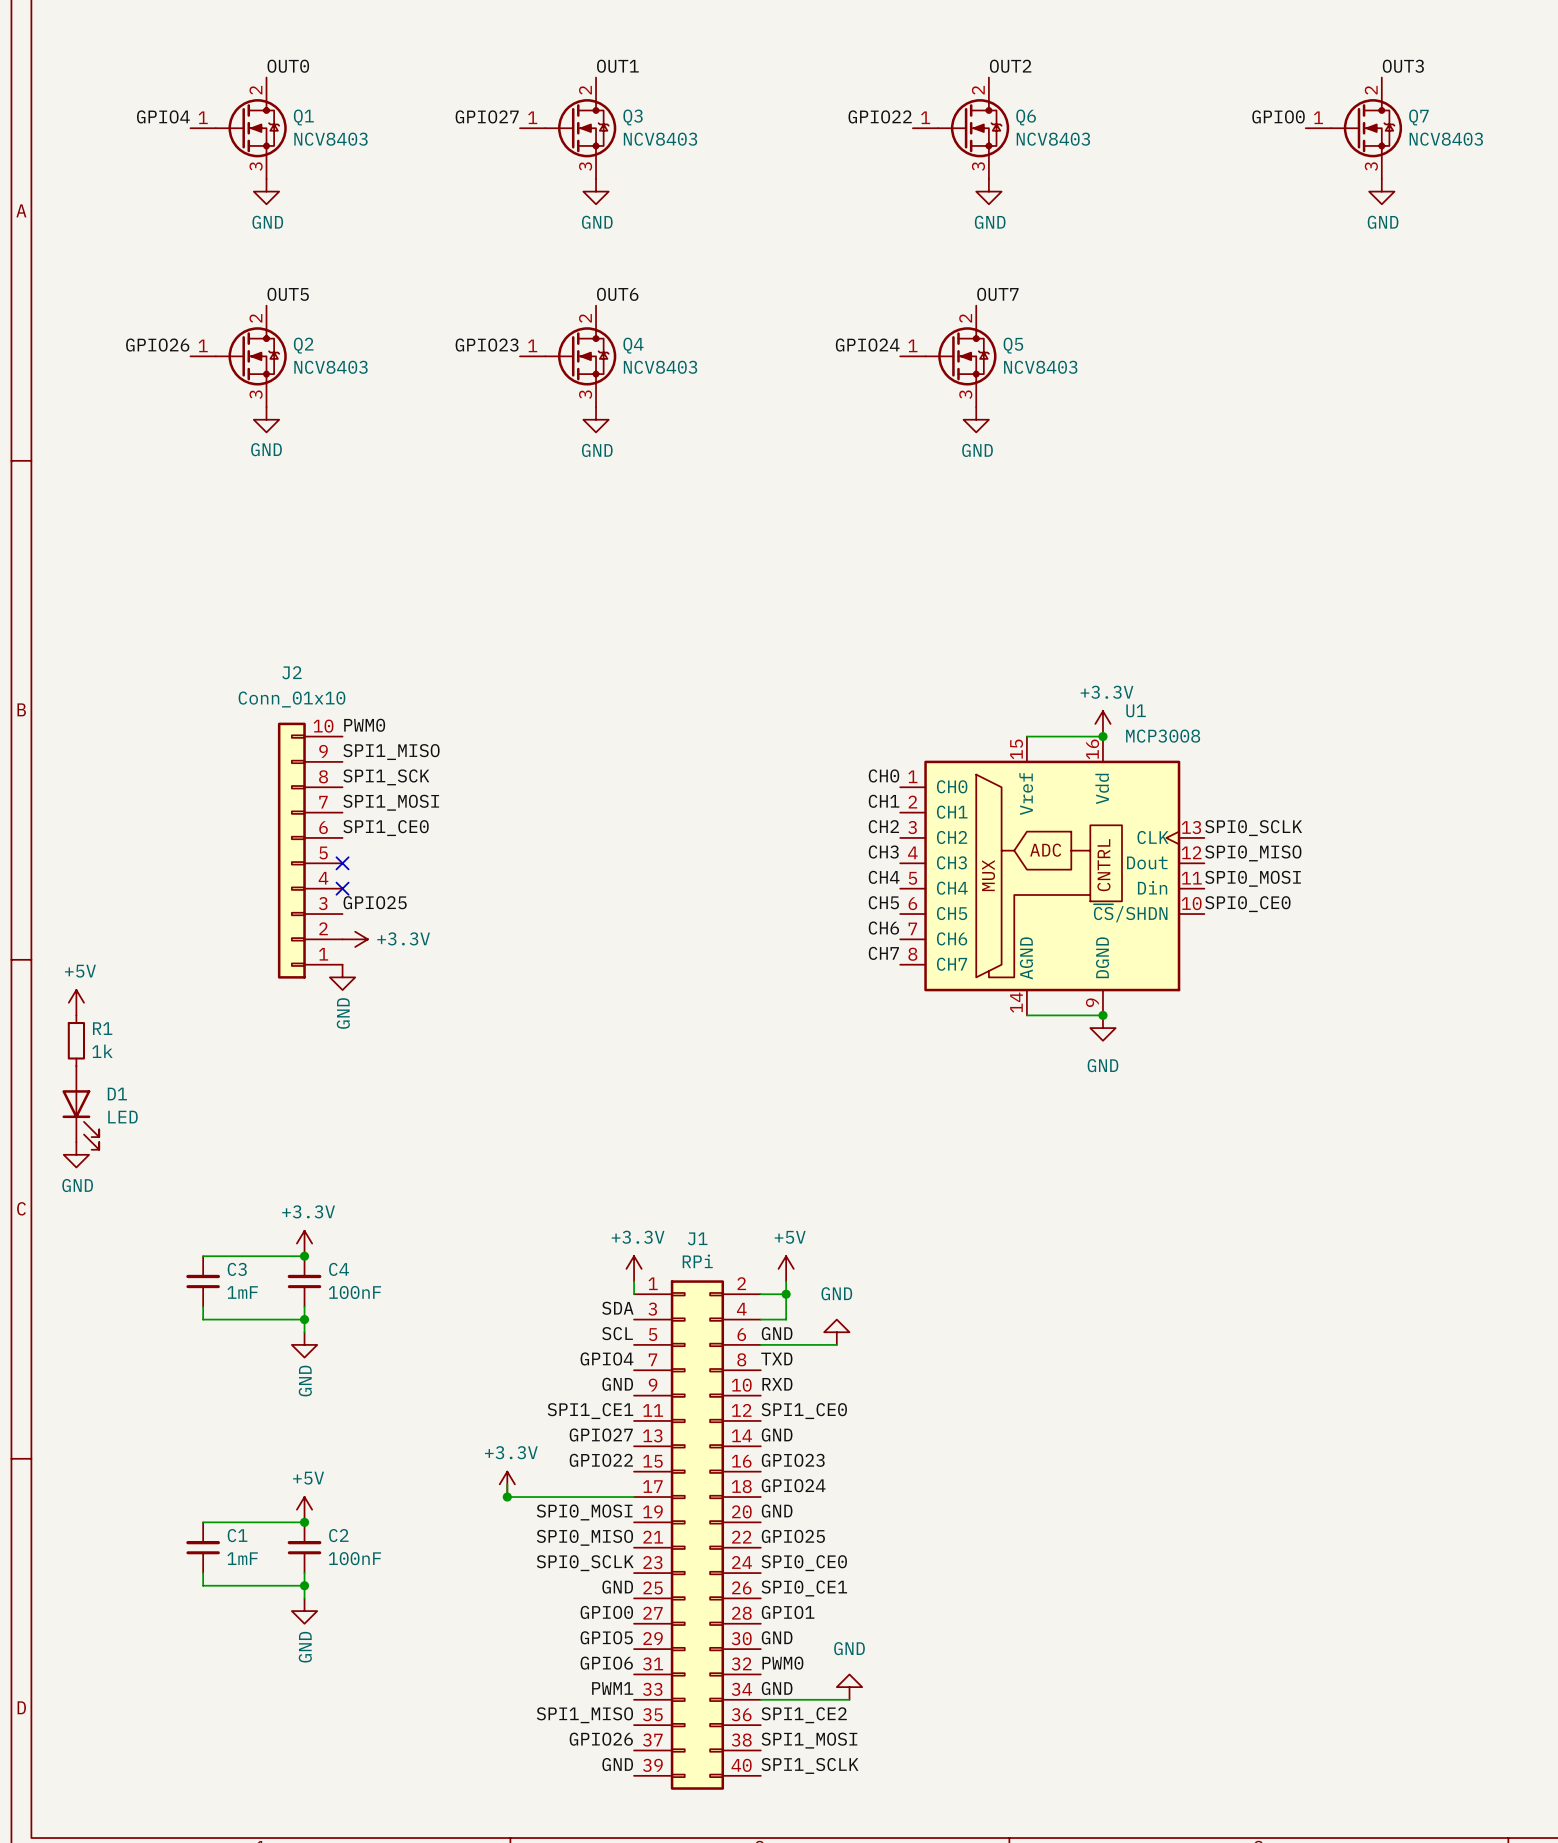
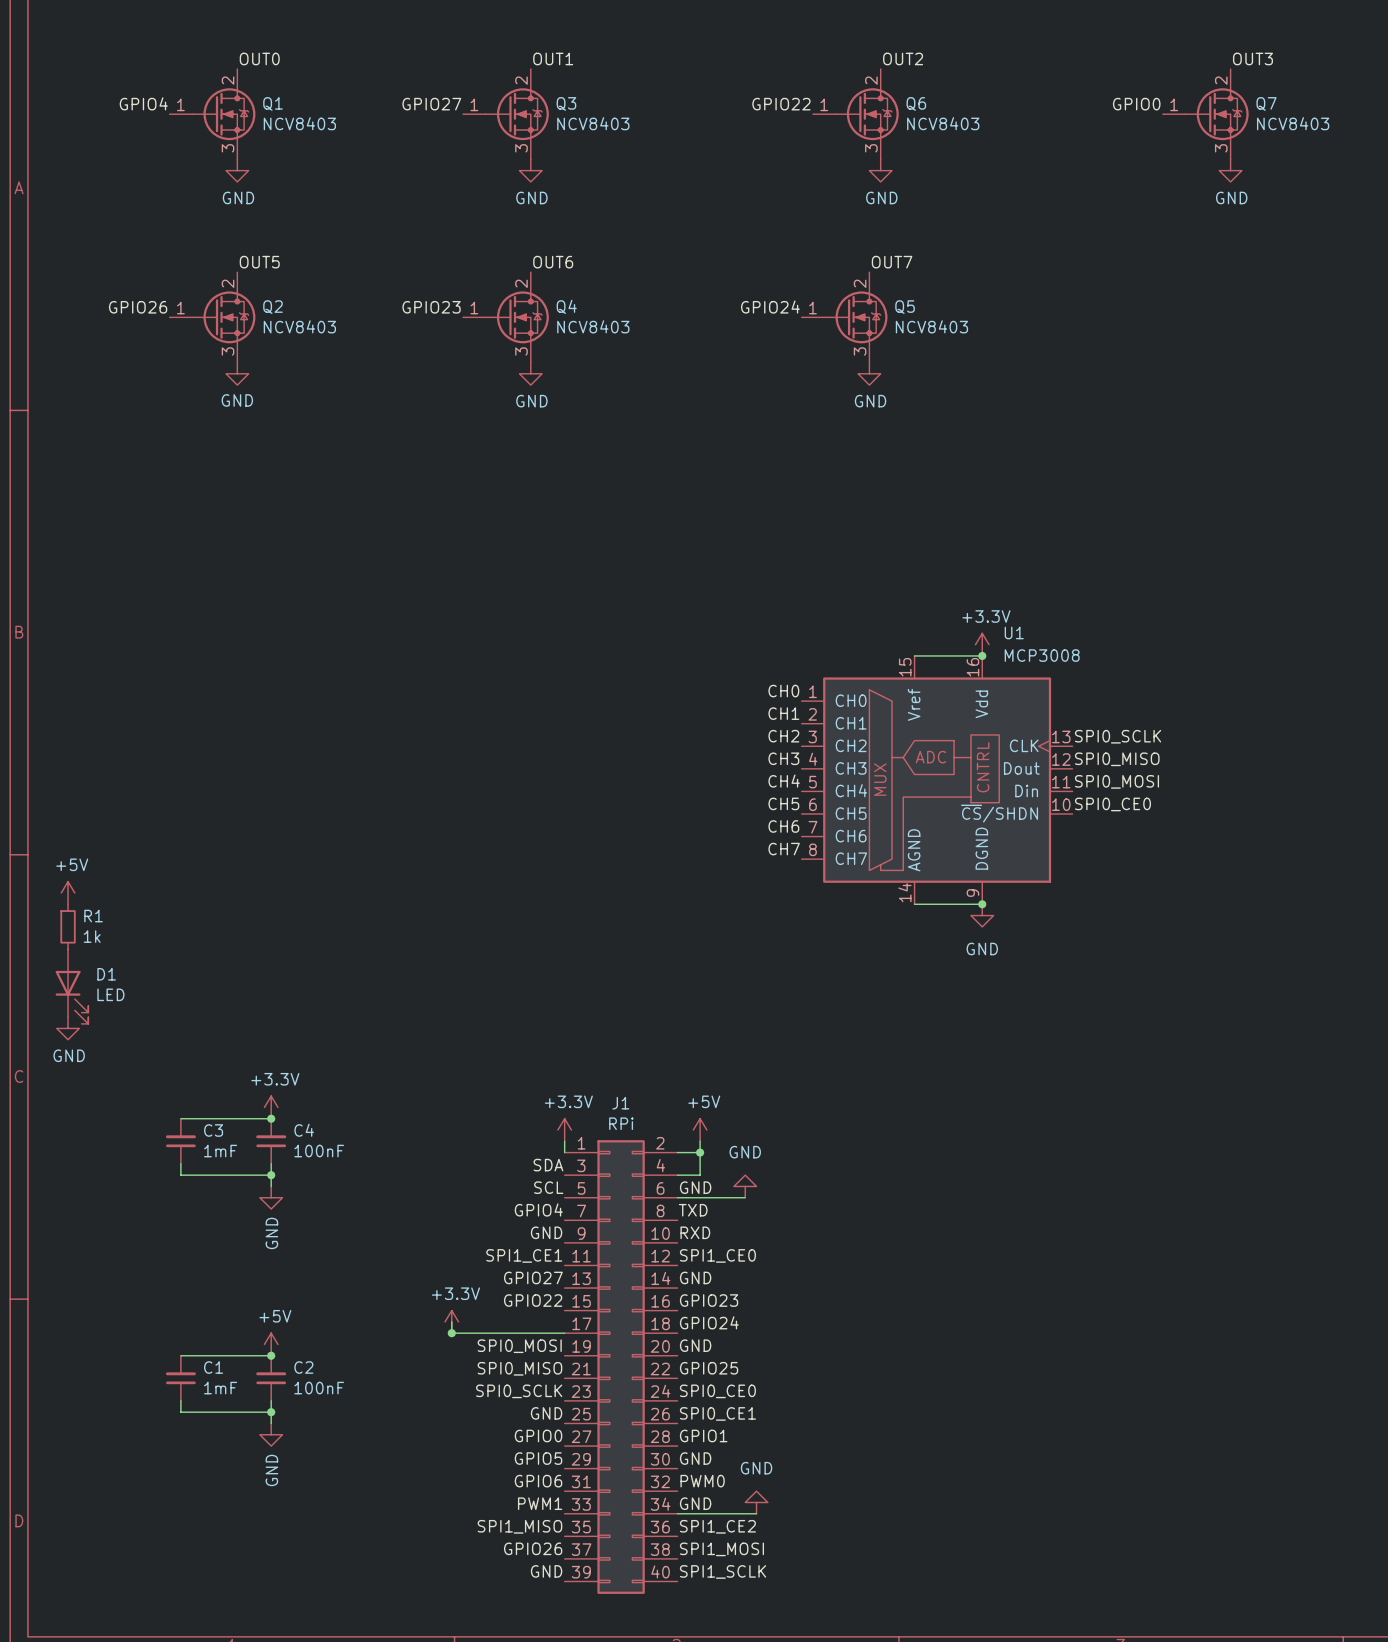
label: PWM0 (364, 725) -> none
label: SPI1_MISO (391, 752) -> none
label: SPI1_SCK (386, 777) -> none
label: SPI1_MOSI (391, 802) -> none
label: SPI1_CE0 (386, 828) -> none
J2: Conn_01x10 (310, 850) -> none
no-connect mark: (342, 863) -> none
no-connect mark: (342, 888) -> none
label: GPIO25 (375, 902) -> none
power symbol: +3.3V (355, 939) -> none
power symbol: GND (342, 977) -> none

